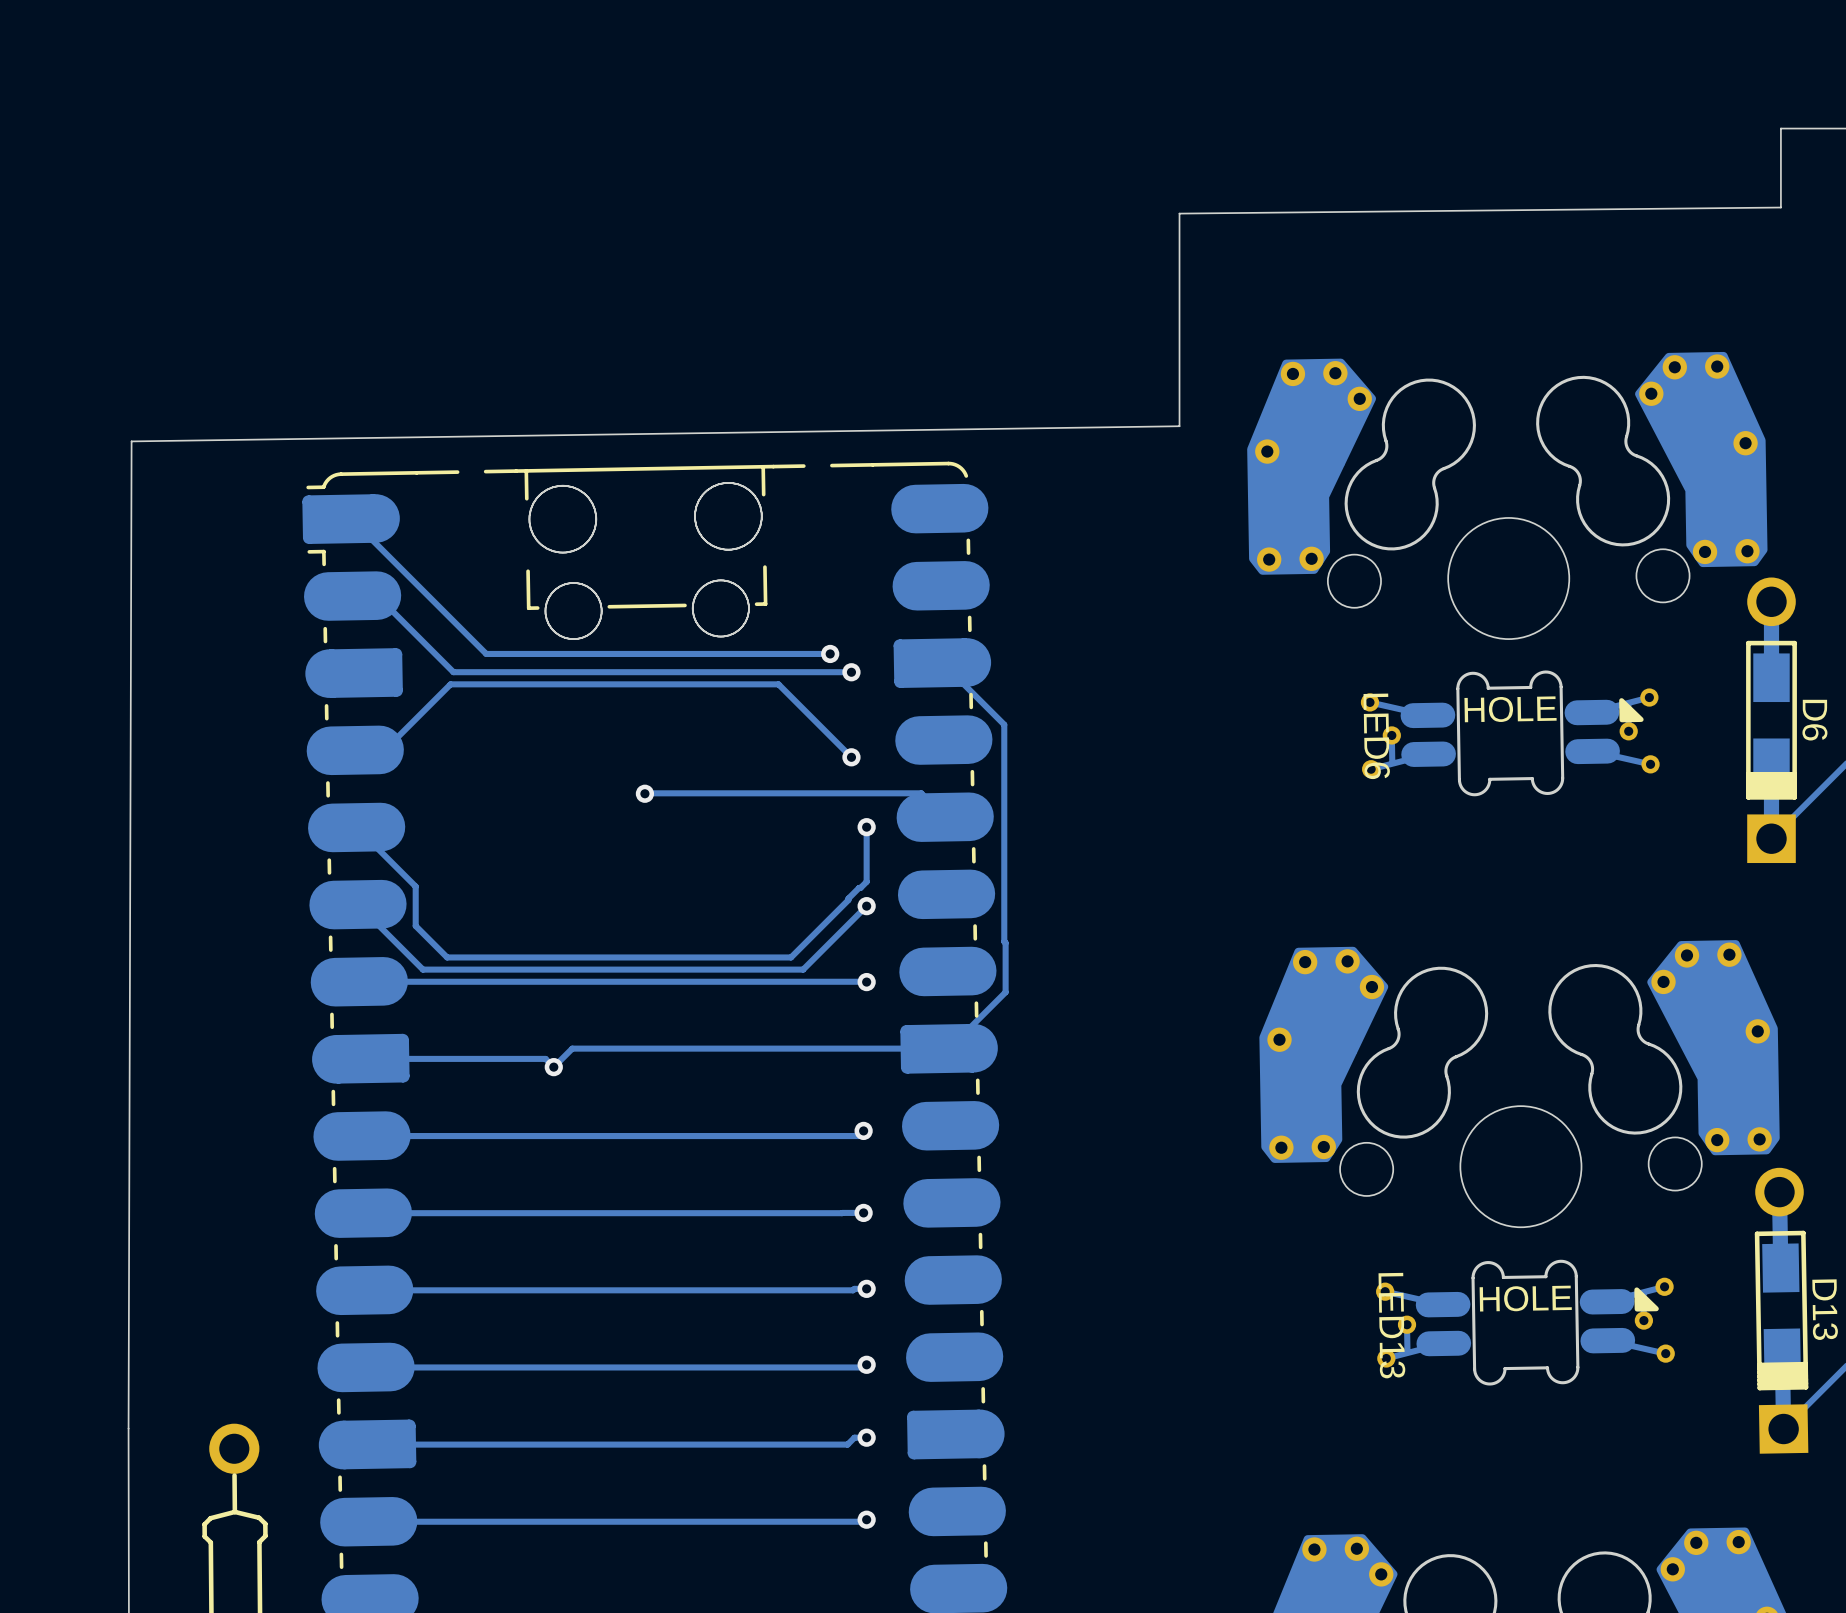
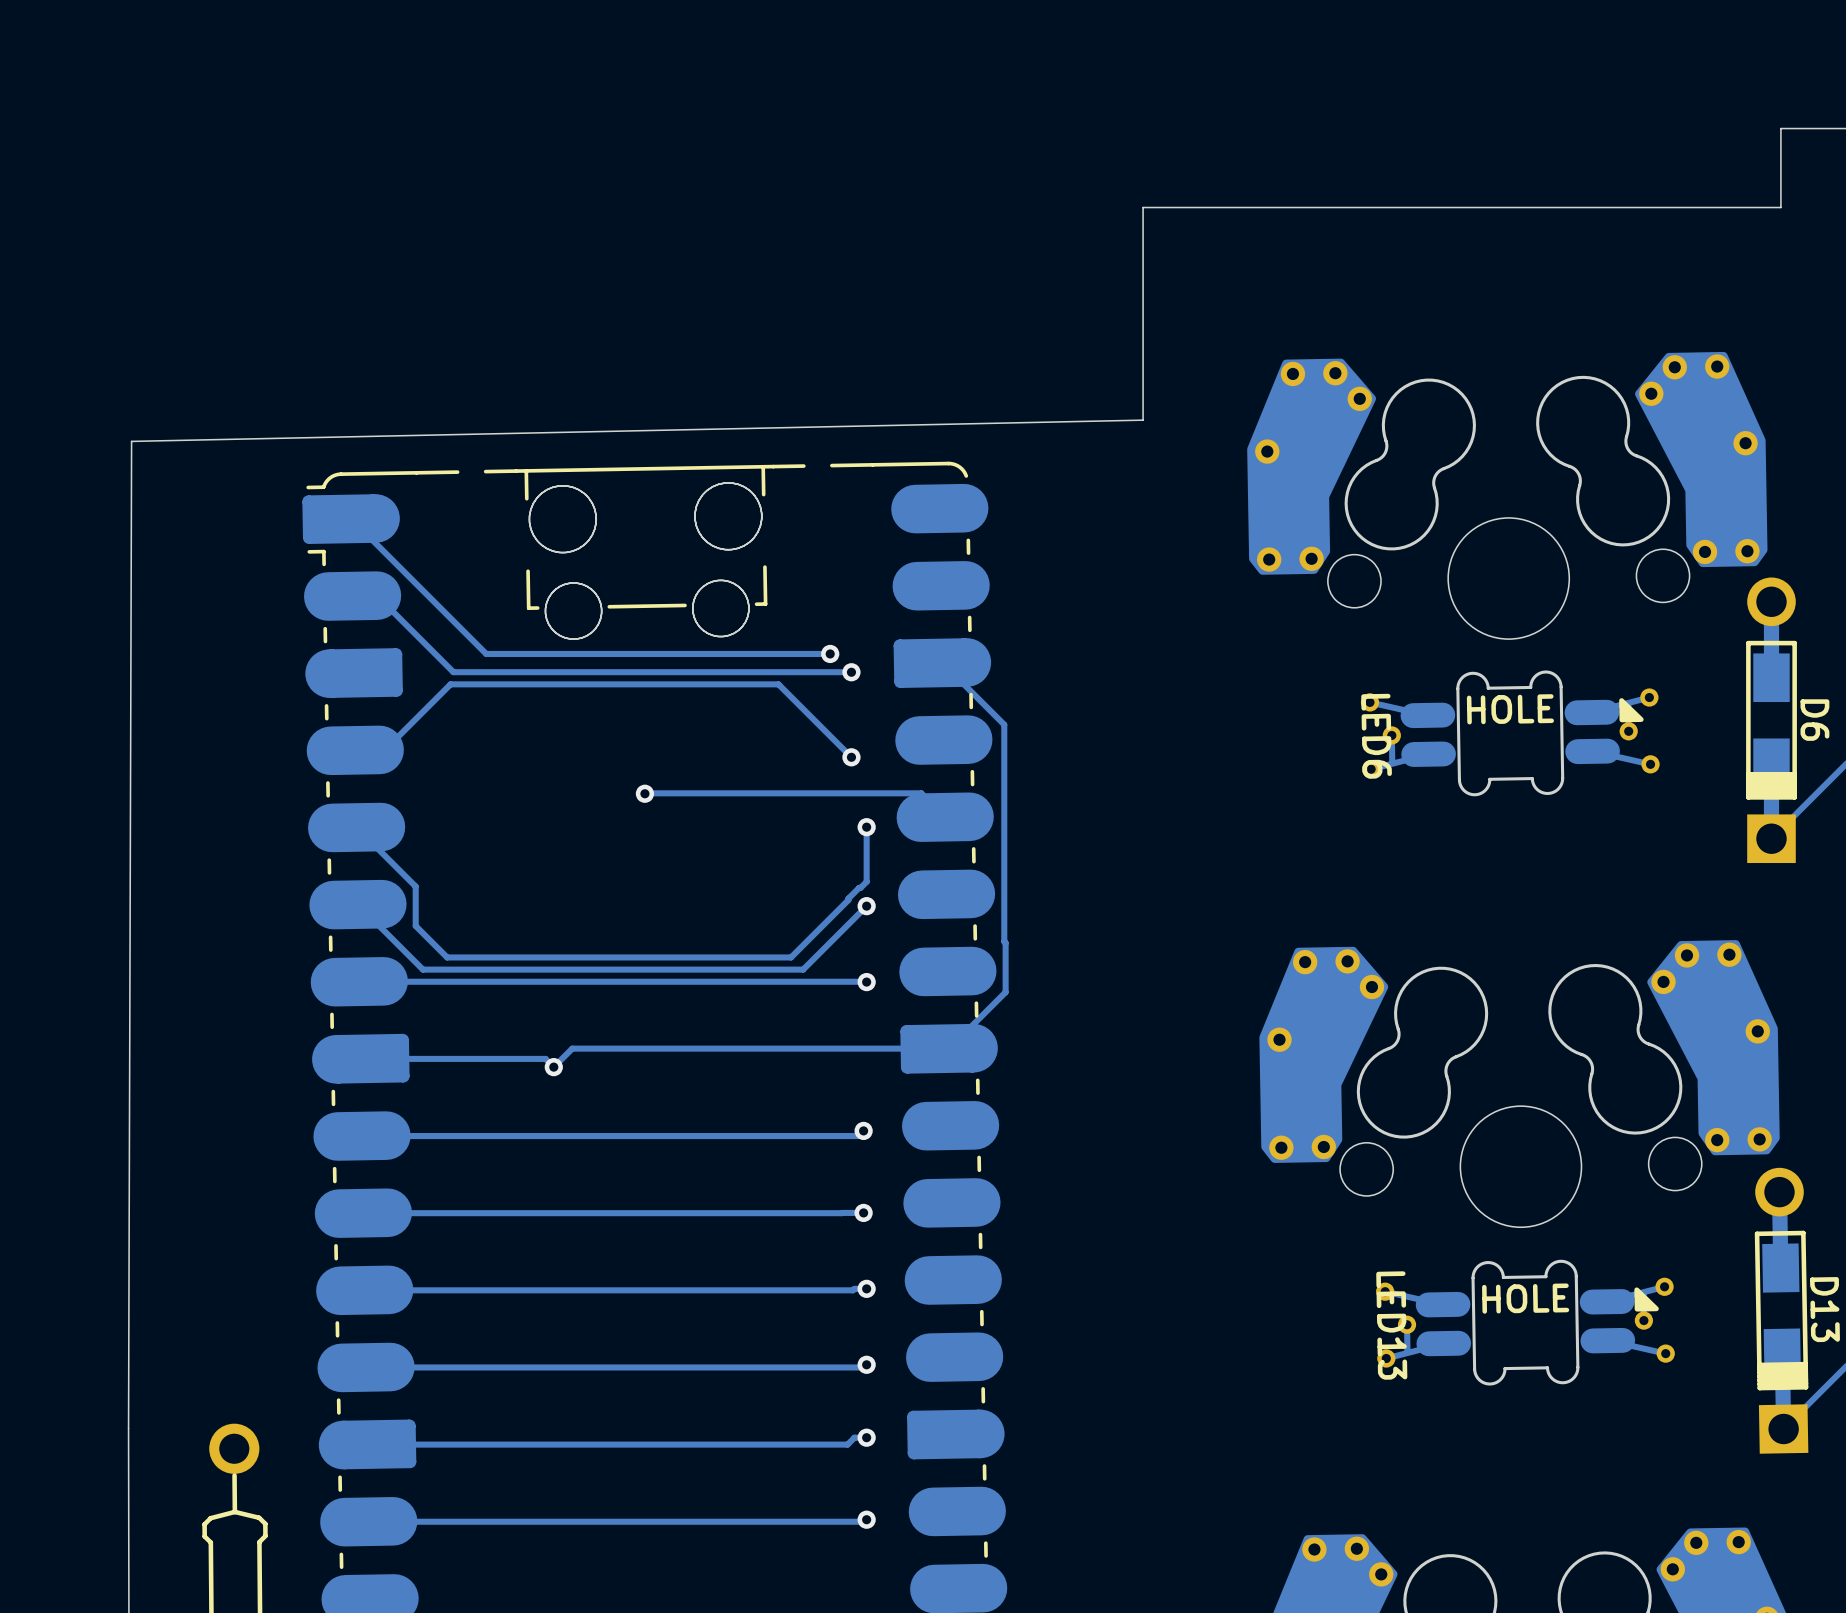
board edge: (1780, 207) (1179, 213) (1179, 426) (131, 441) -> (1780, 207) (1143, 207) (1143, 420) (131, 441)

